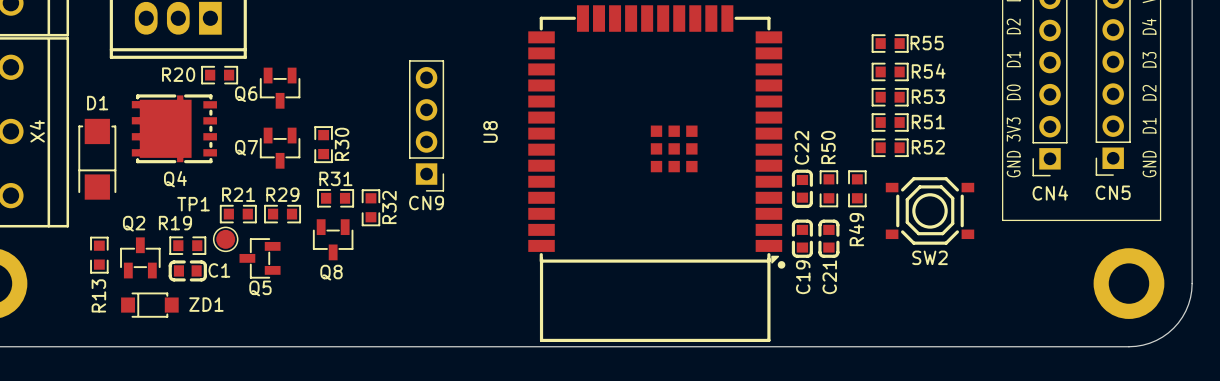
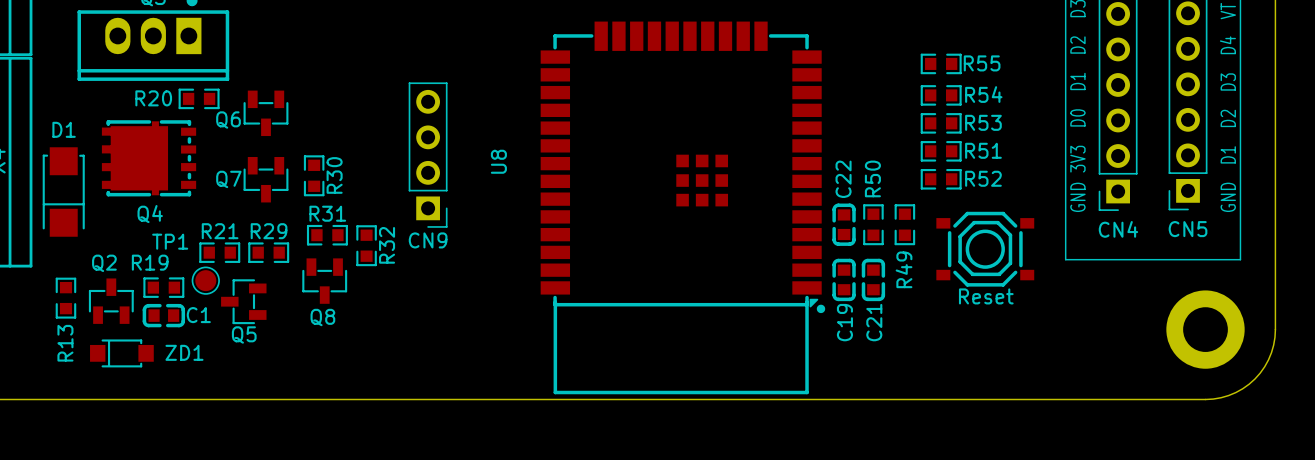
text: none -> Reset (986, 296)
SW2 name: SW2 (930, 257) -> none

